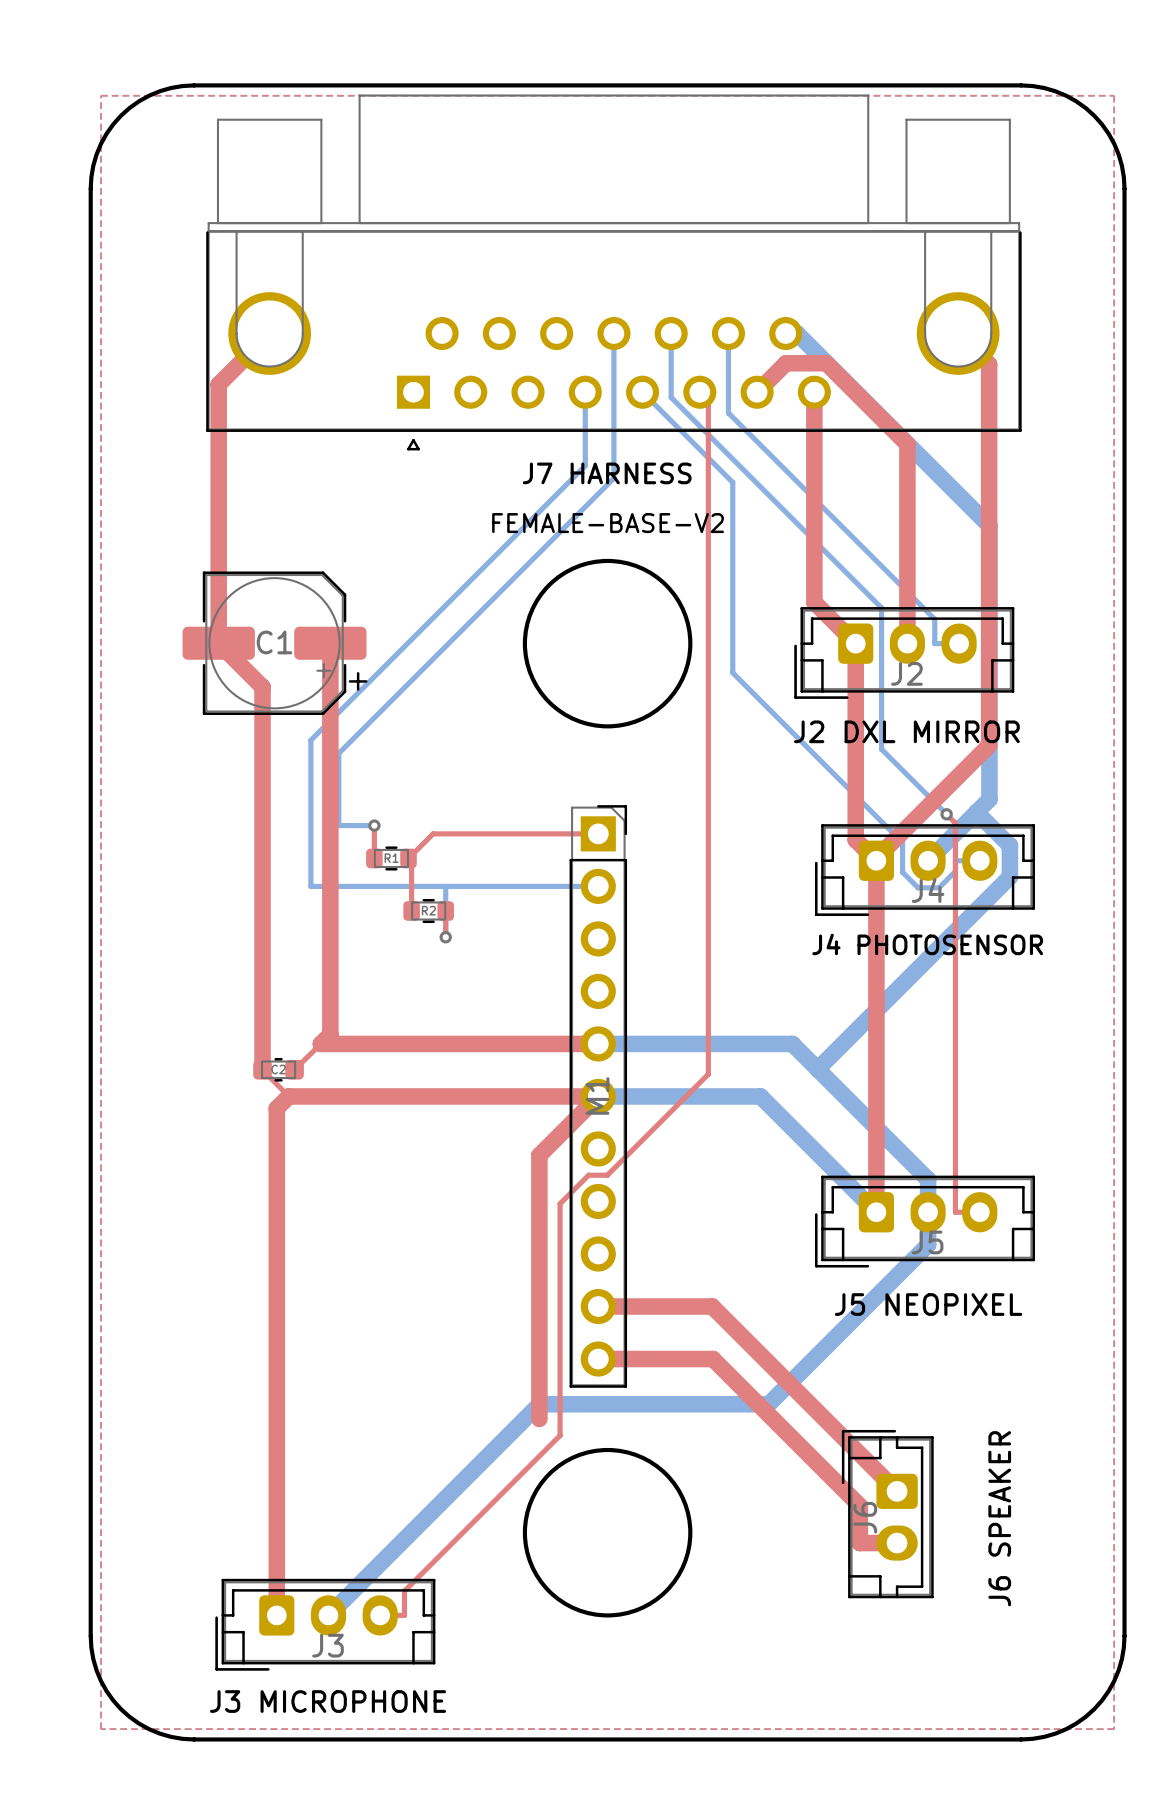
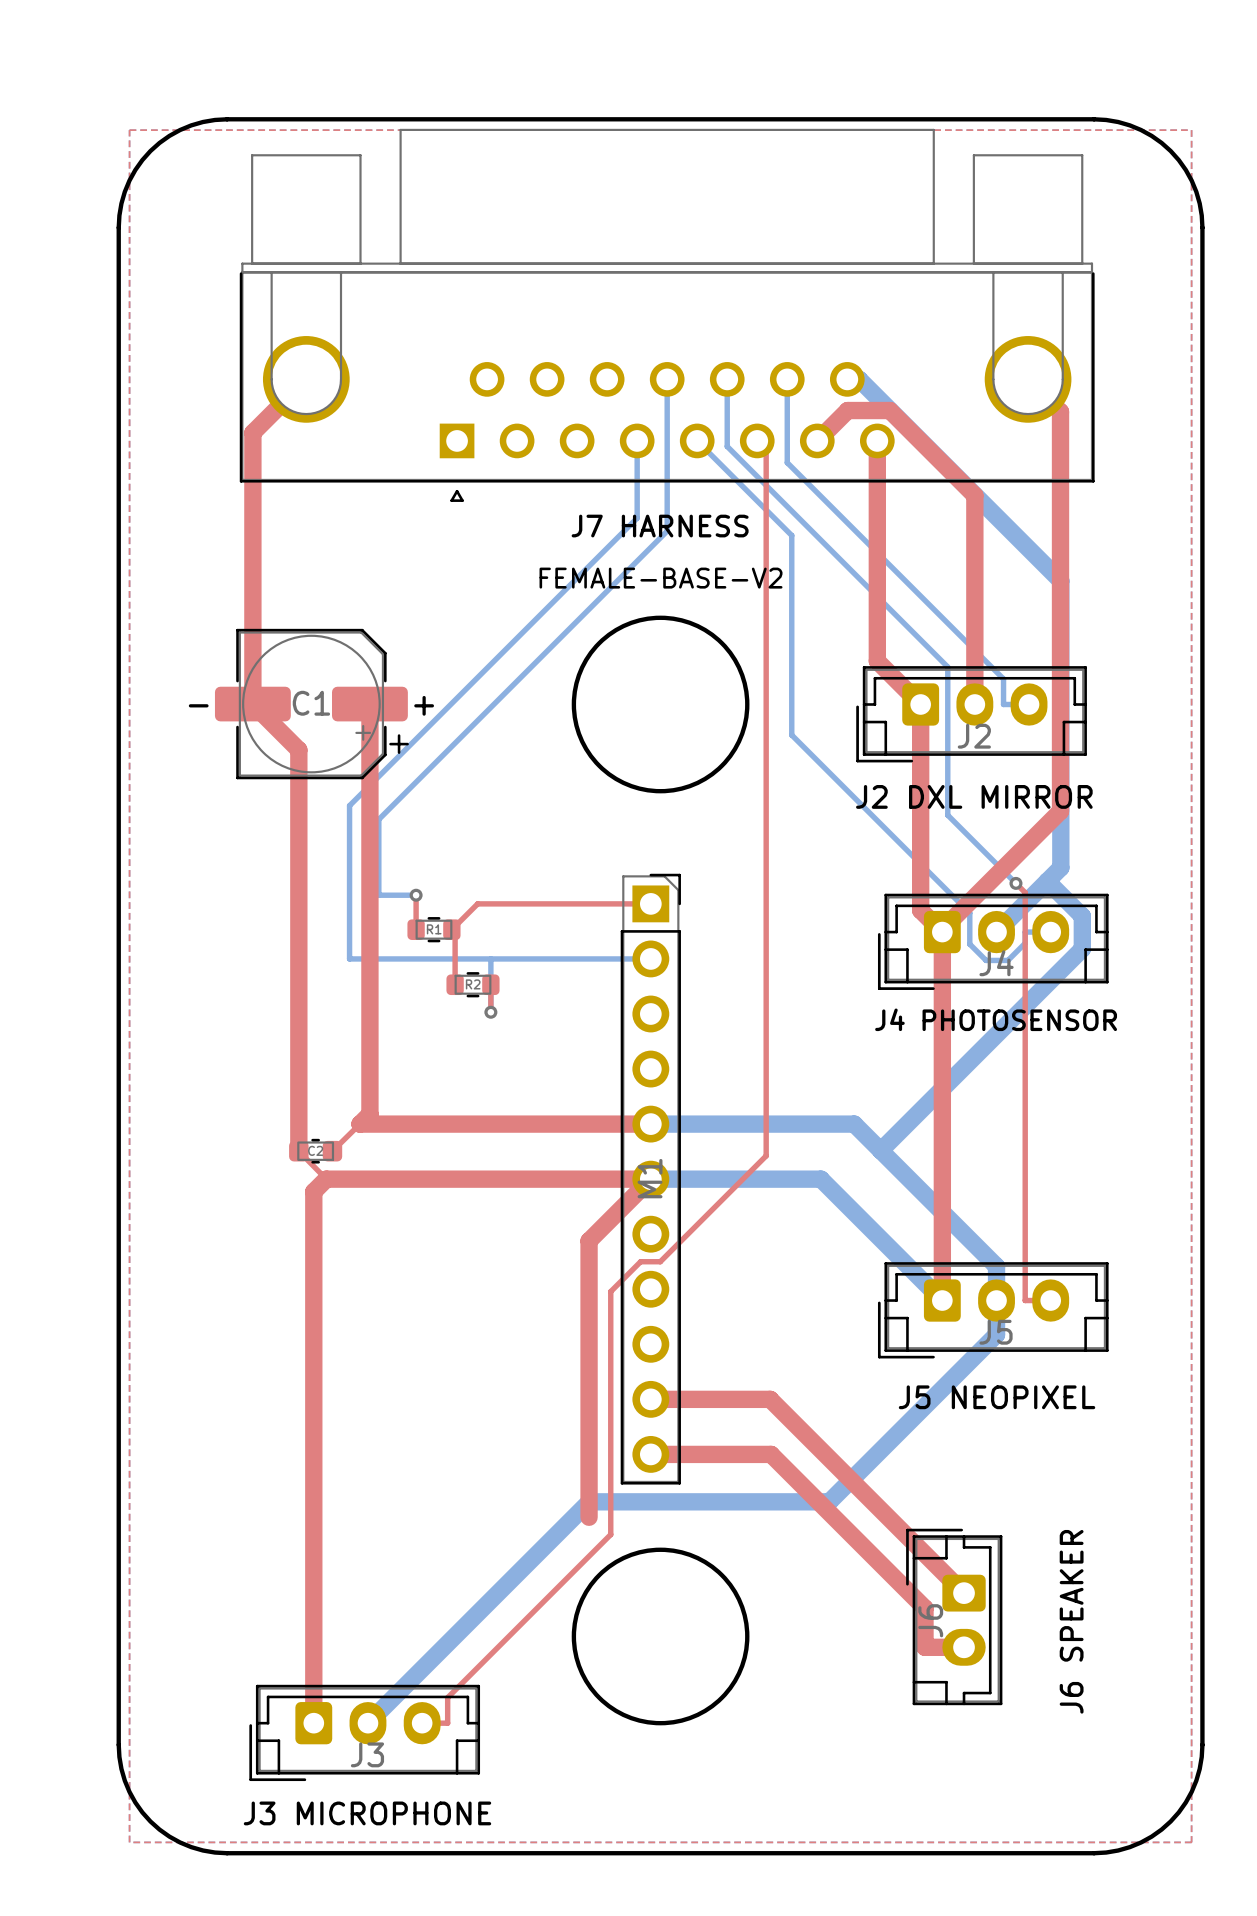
C1 text: none -> - (198, 705)
C1 text: none -> + (424, 705)

